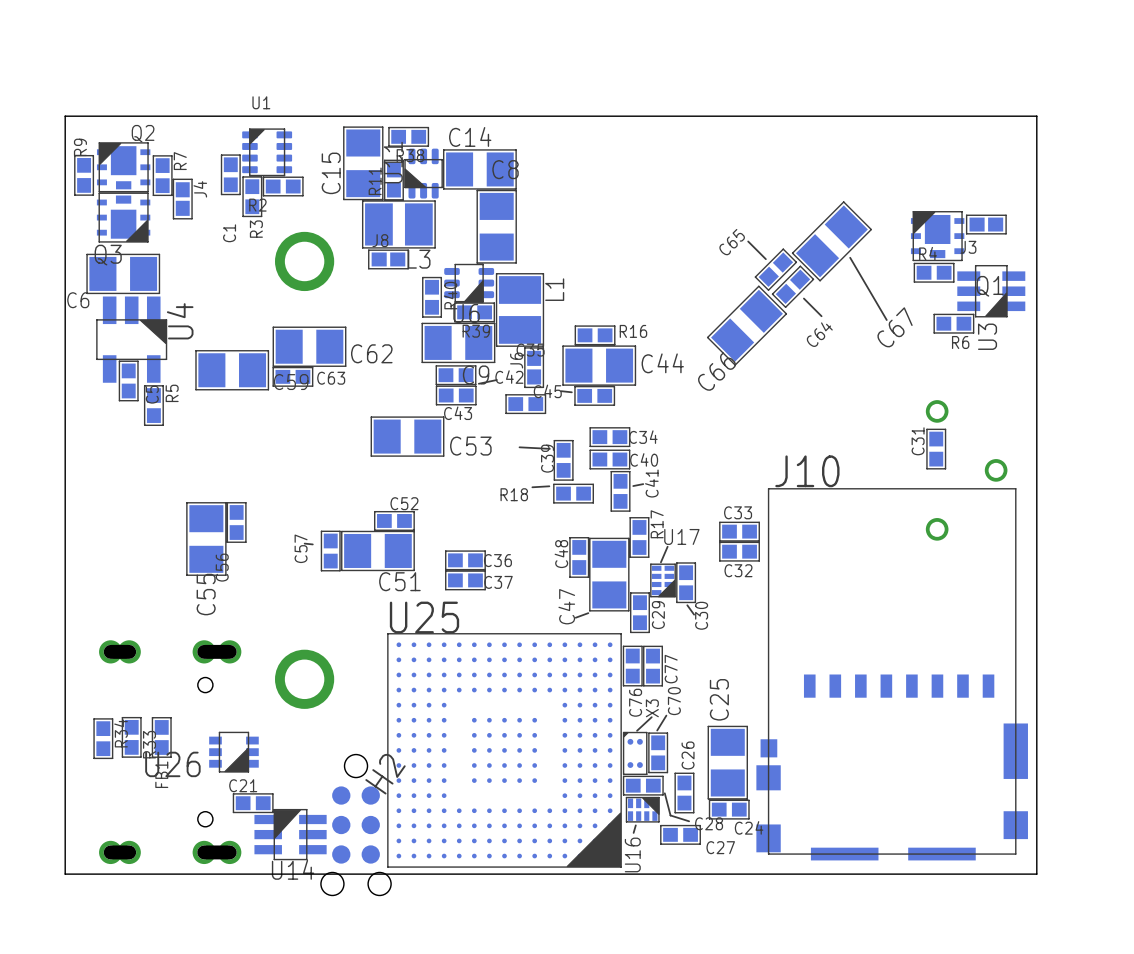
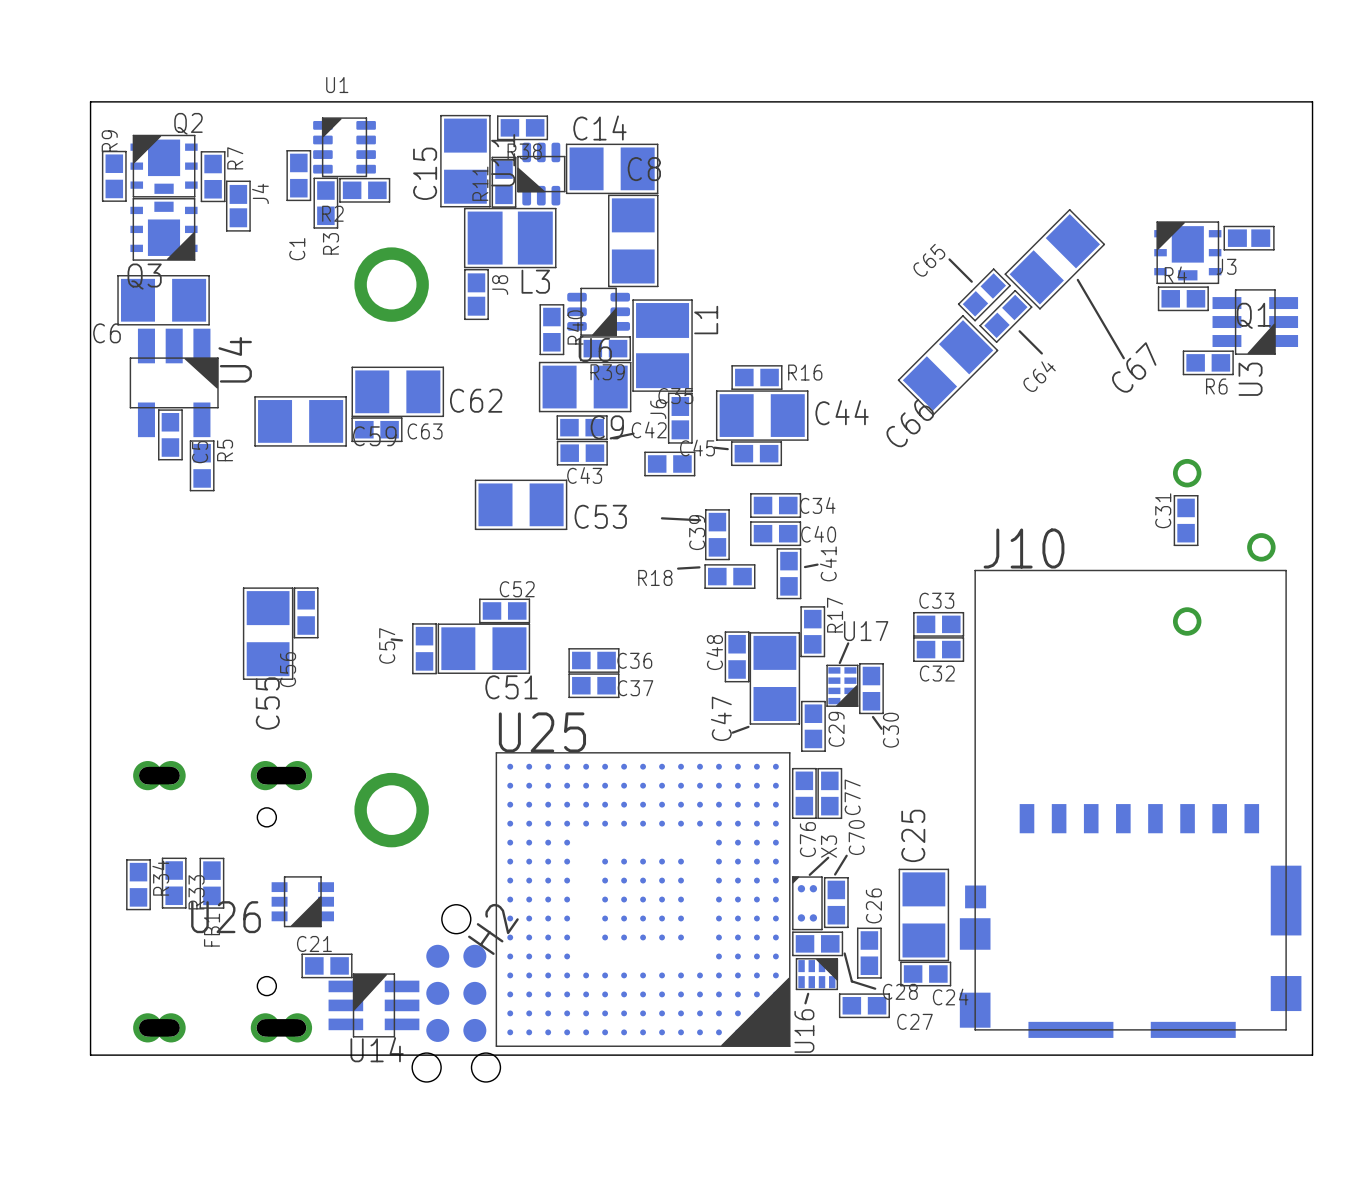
J8 rotation: 0° (388, 259) -> 90° clockwise (476, 294)

